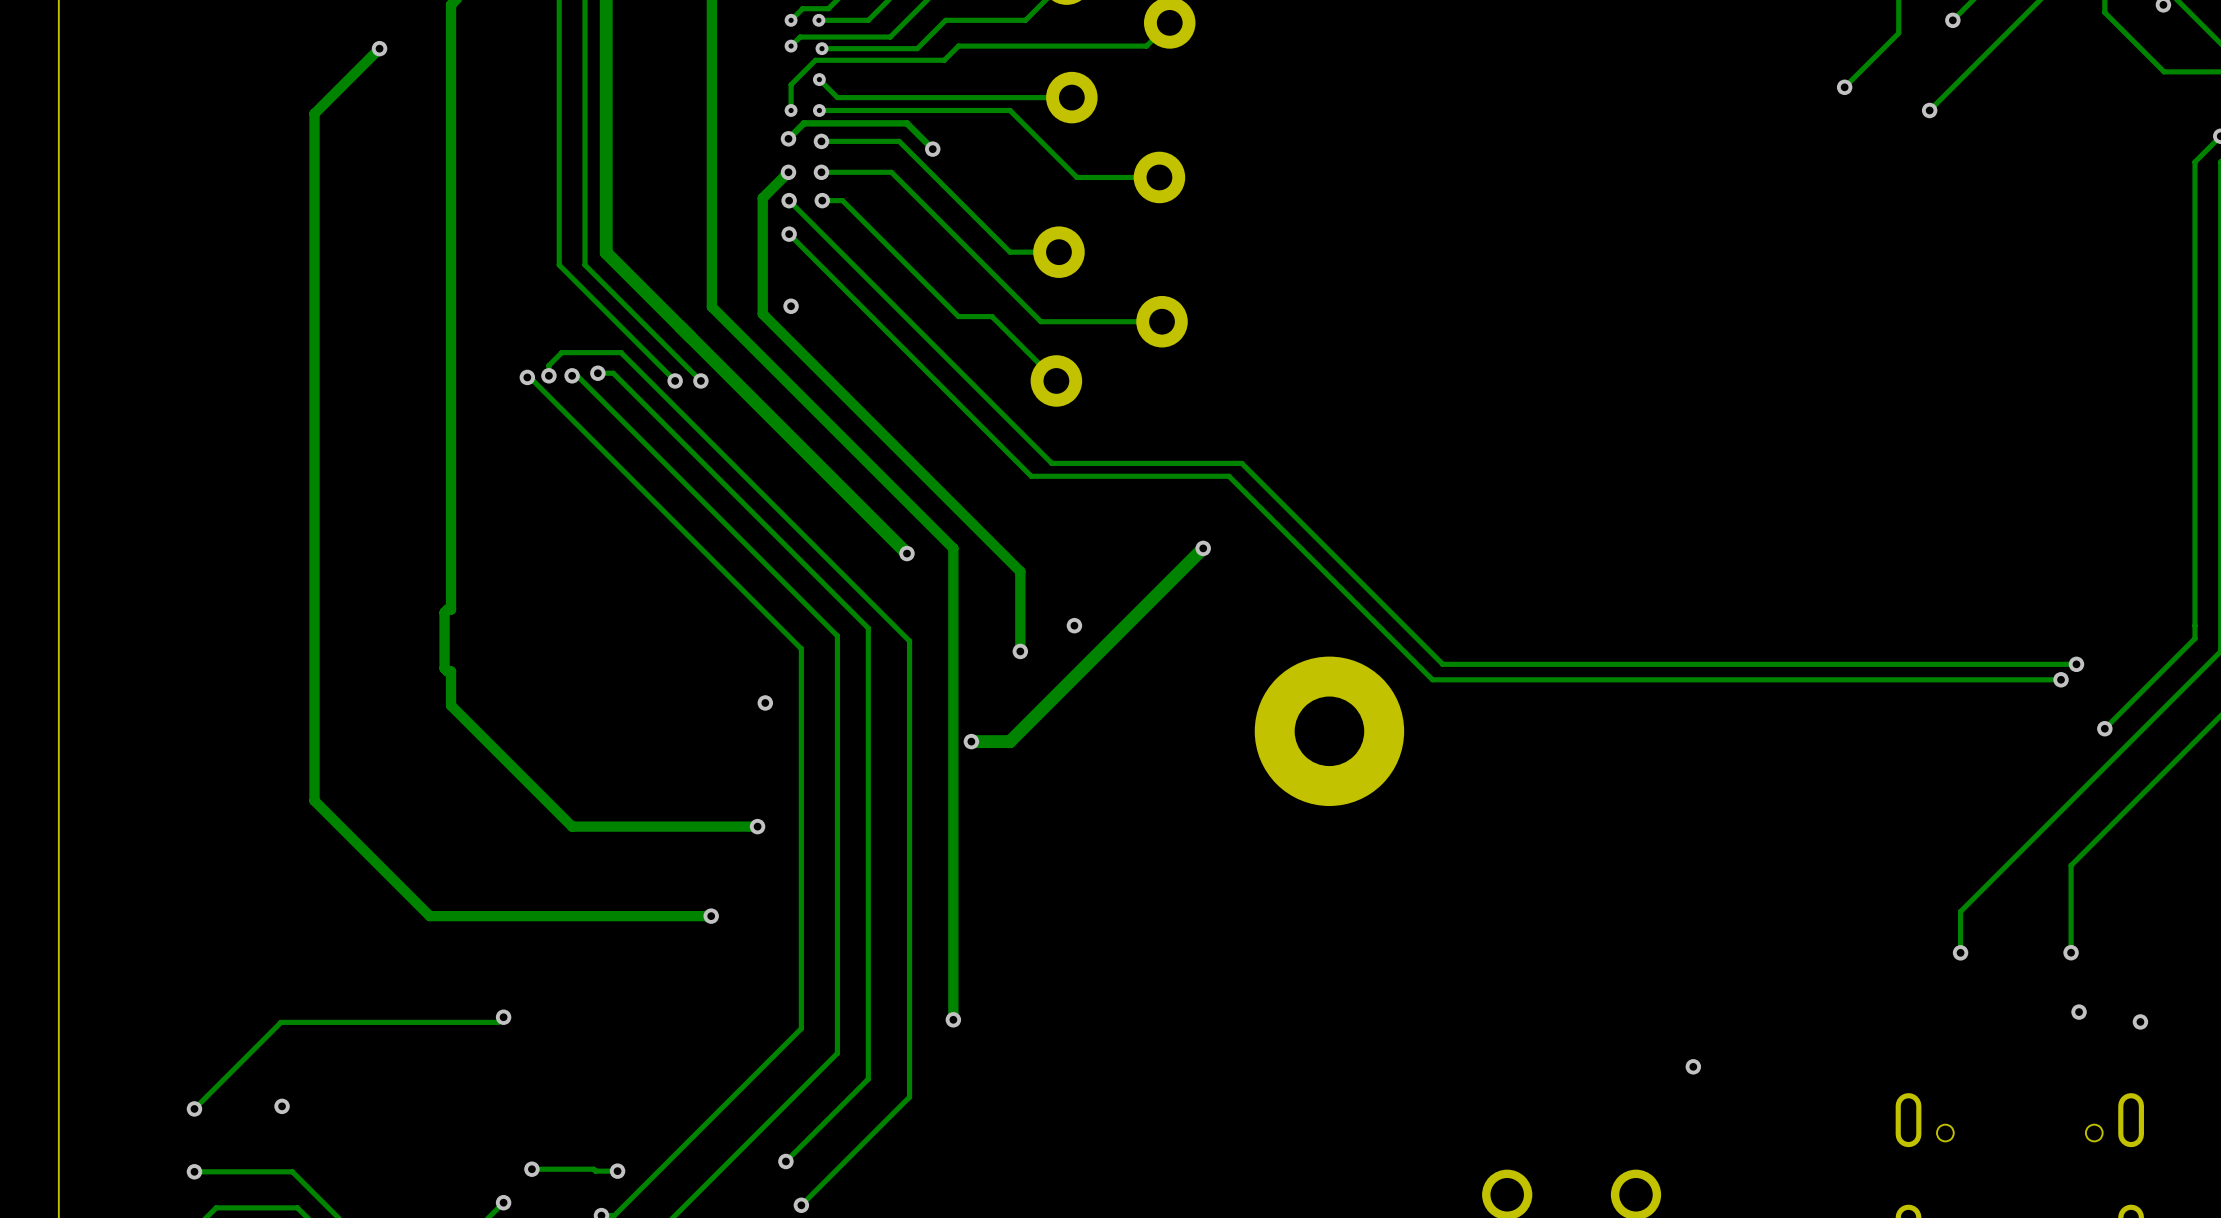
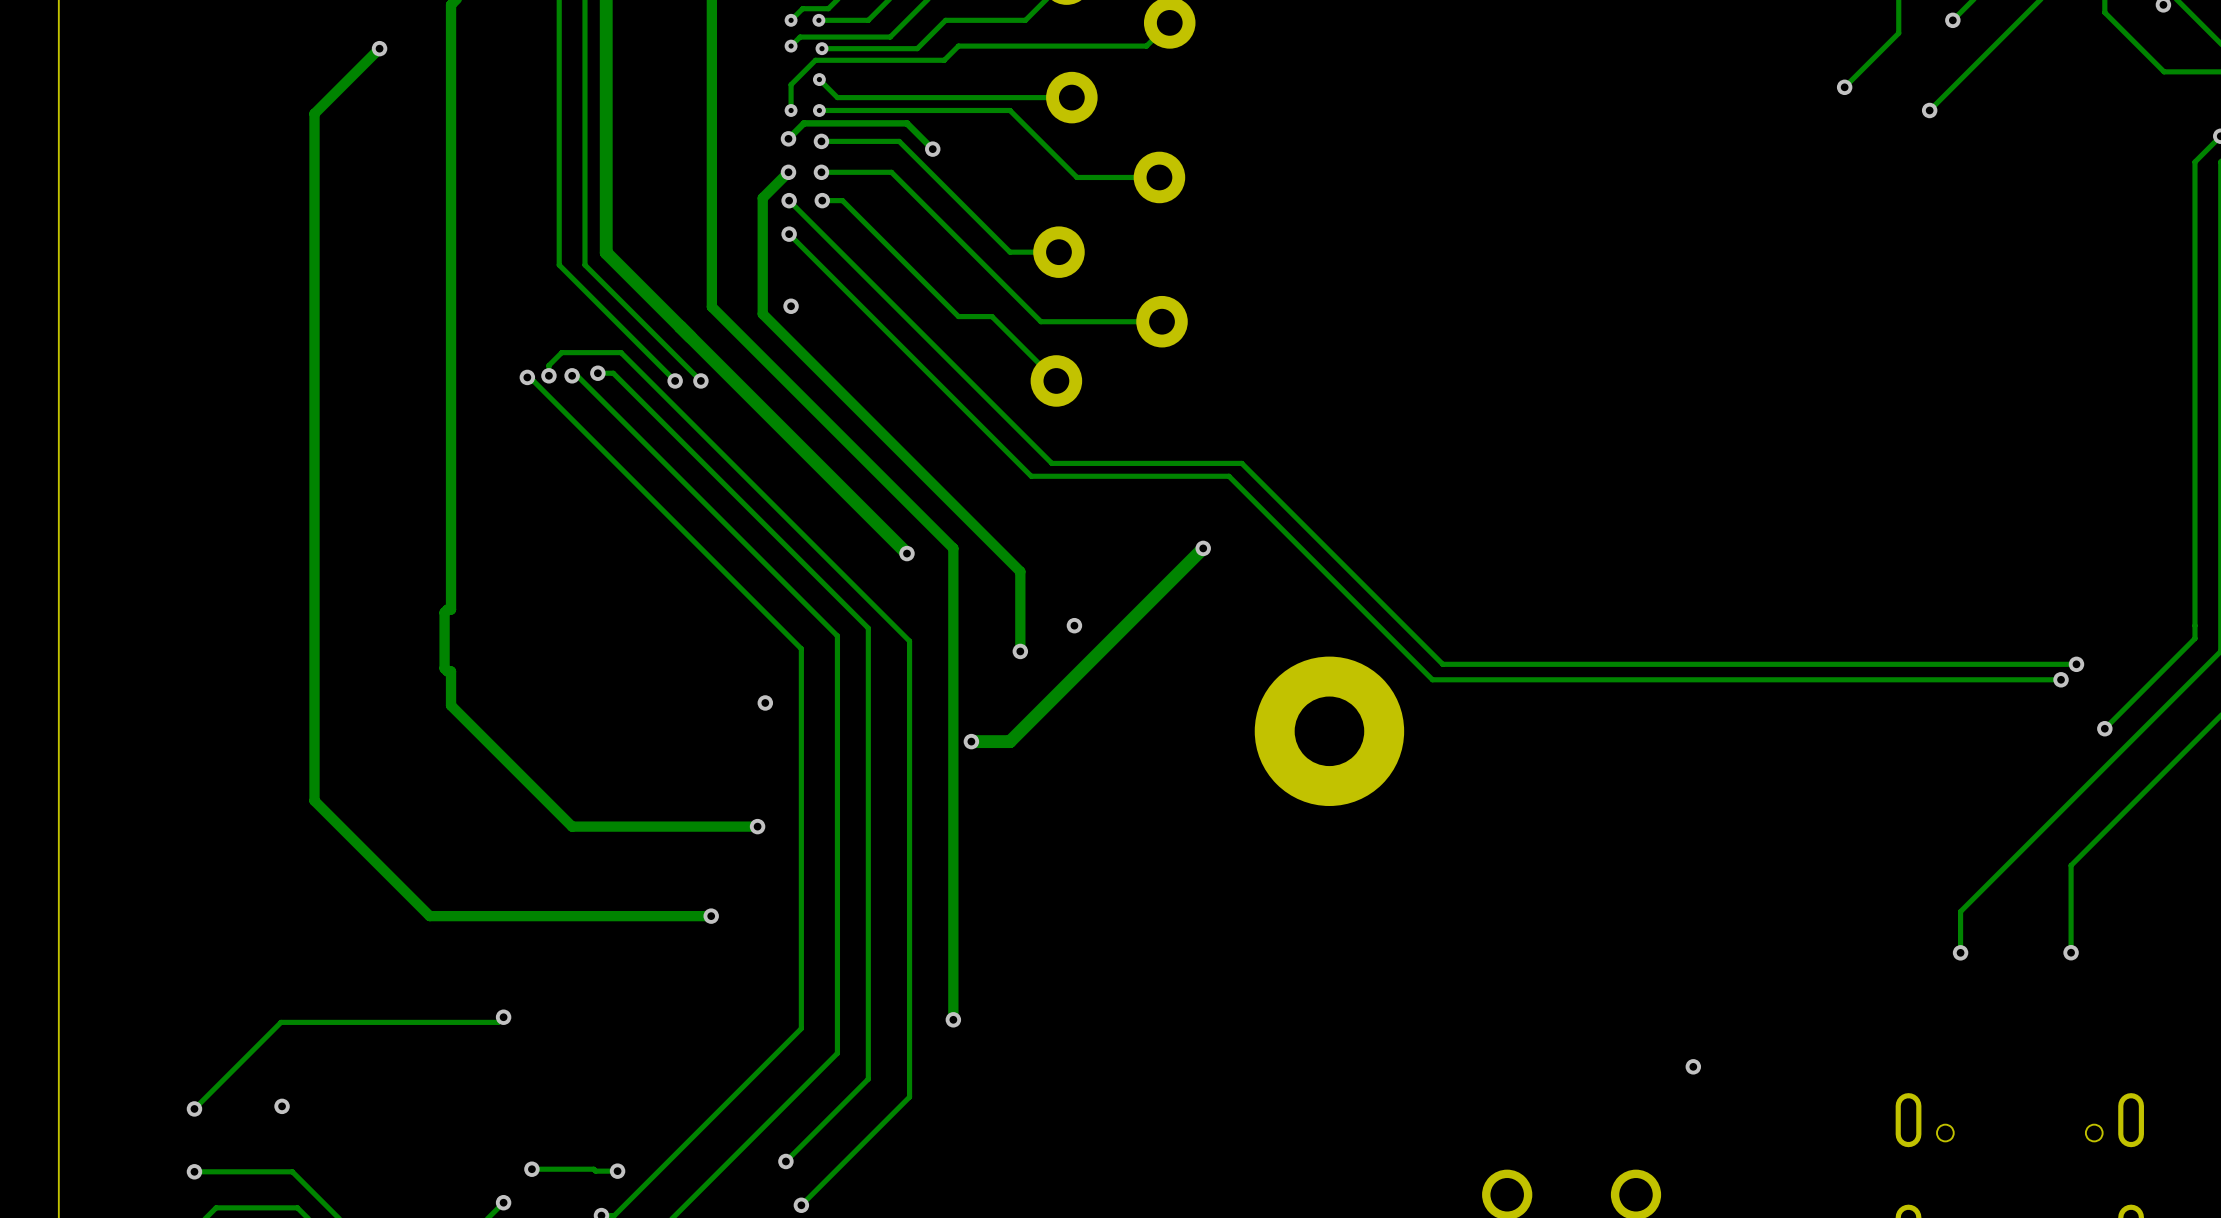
via: (2079, 1012) -> none
via: (2140, 1021) -> none

